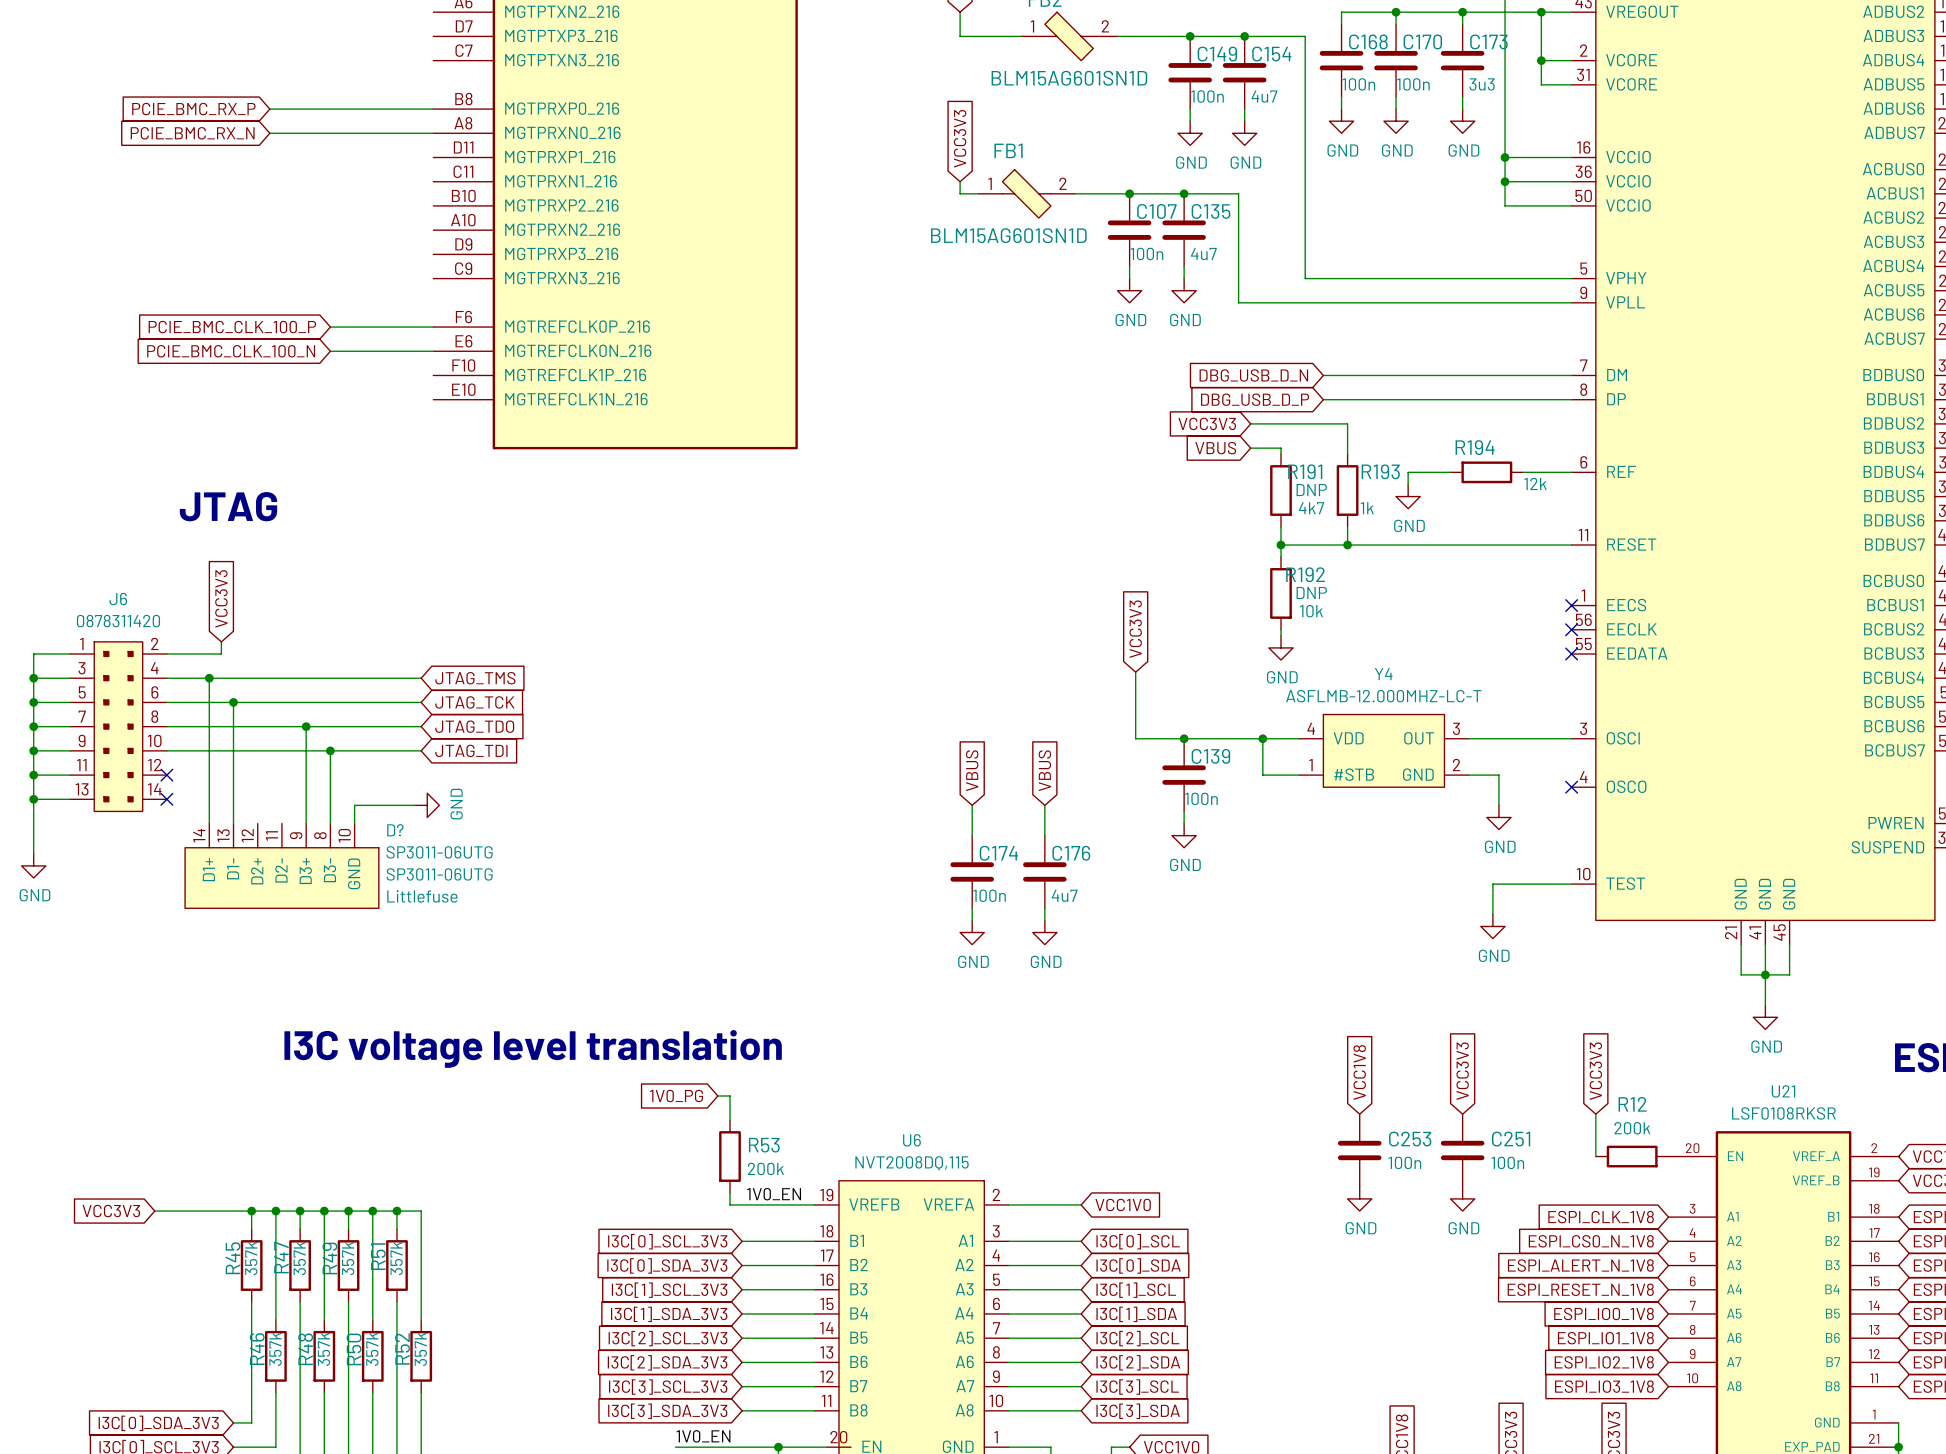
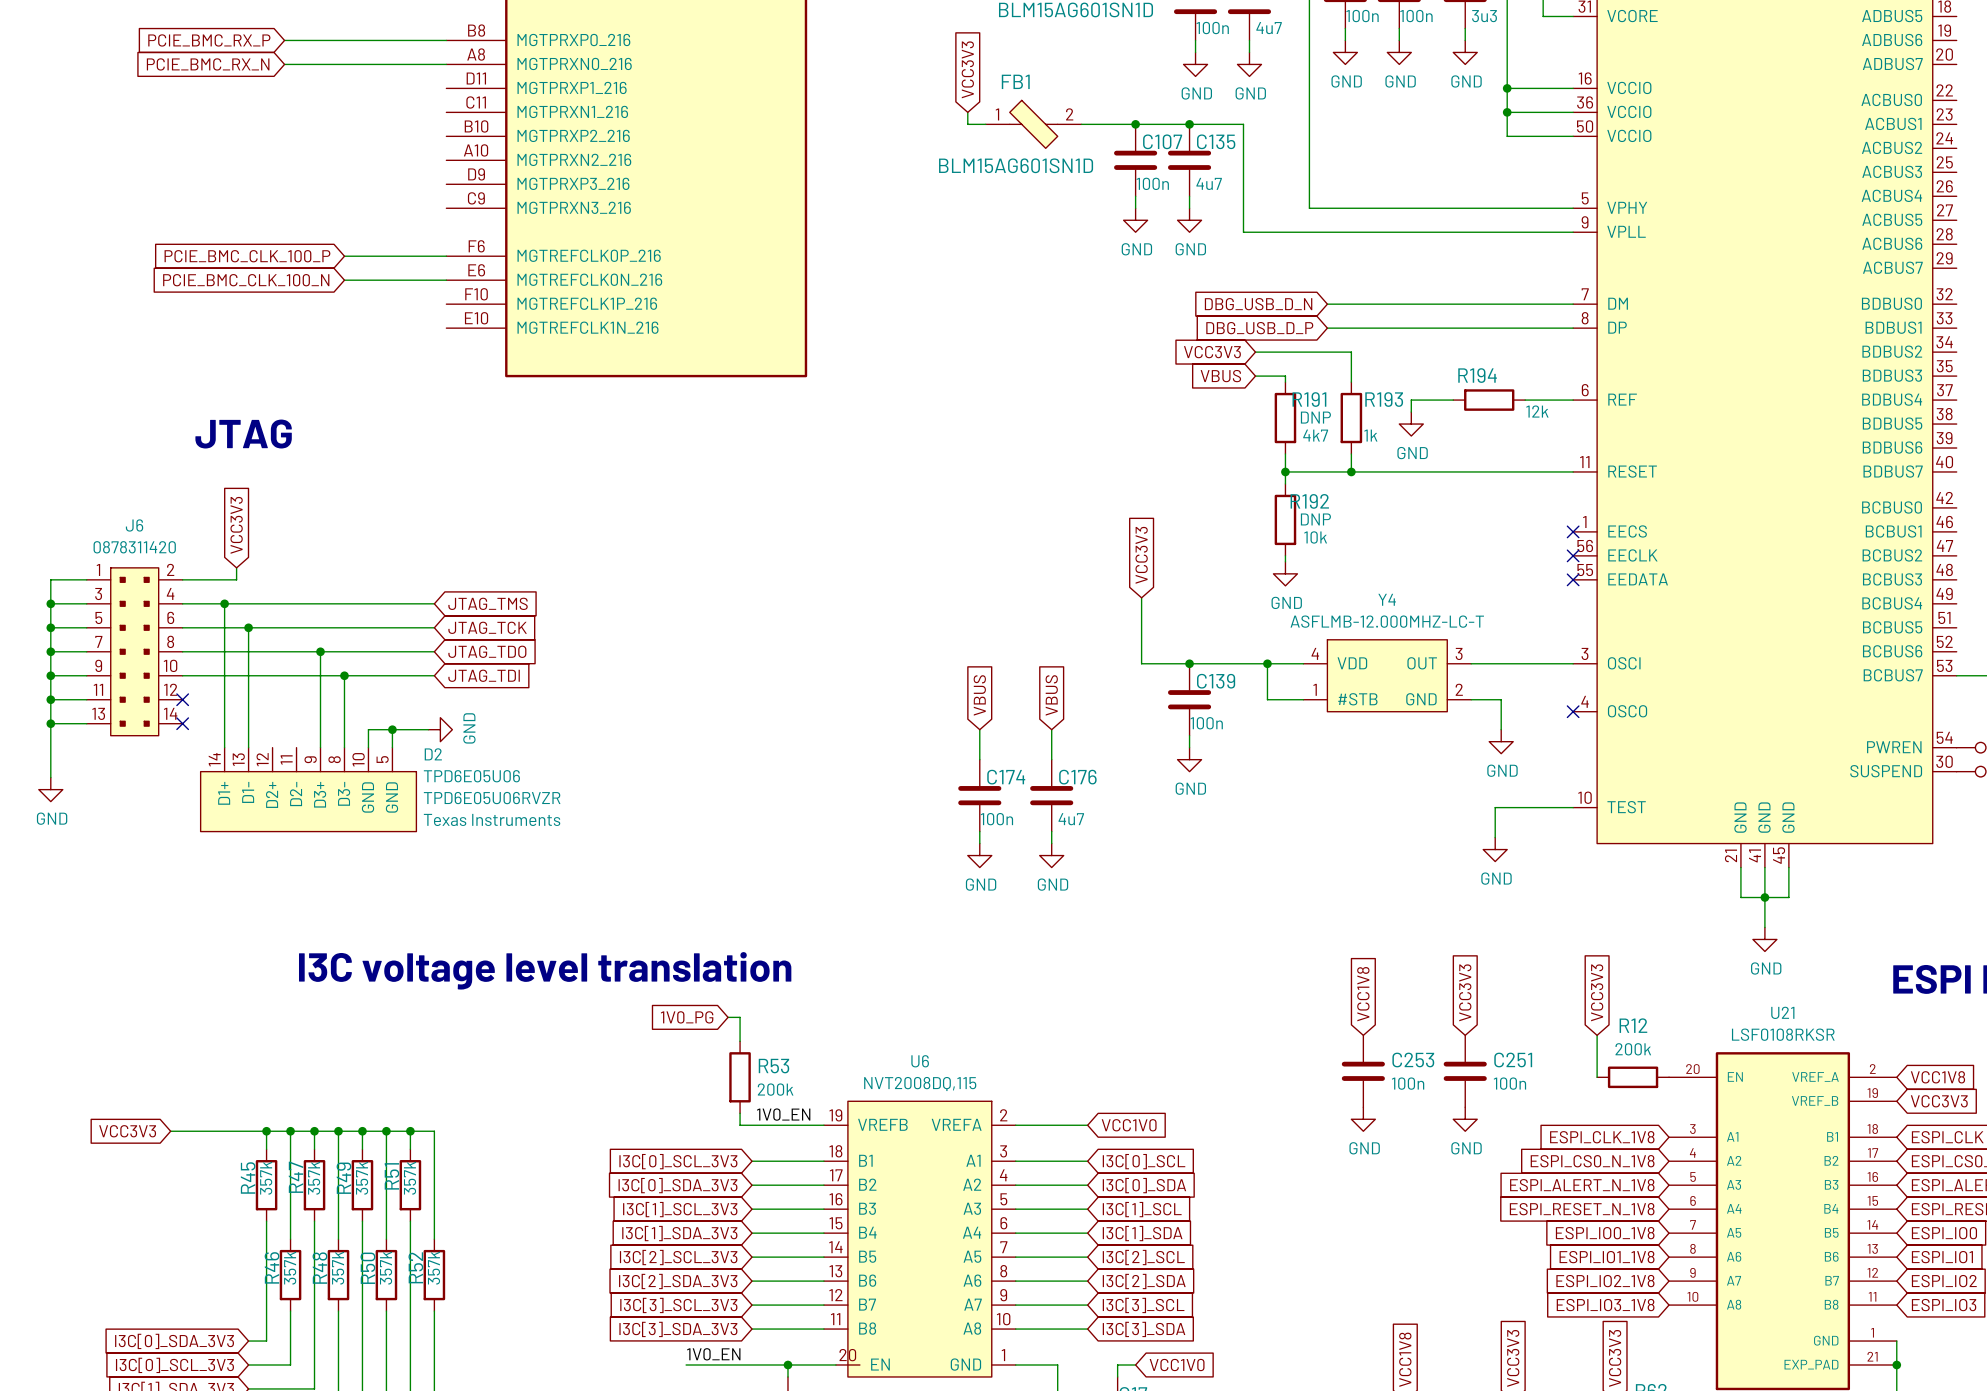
wire: none -> (392, 729) (392, 747)
junction: none -> (392, 729)
D?: SP3011-06UTG (281, 865) -> none
D2: none -> TPD6E05U06 (308, 789)

